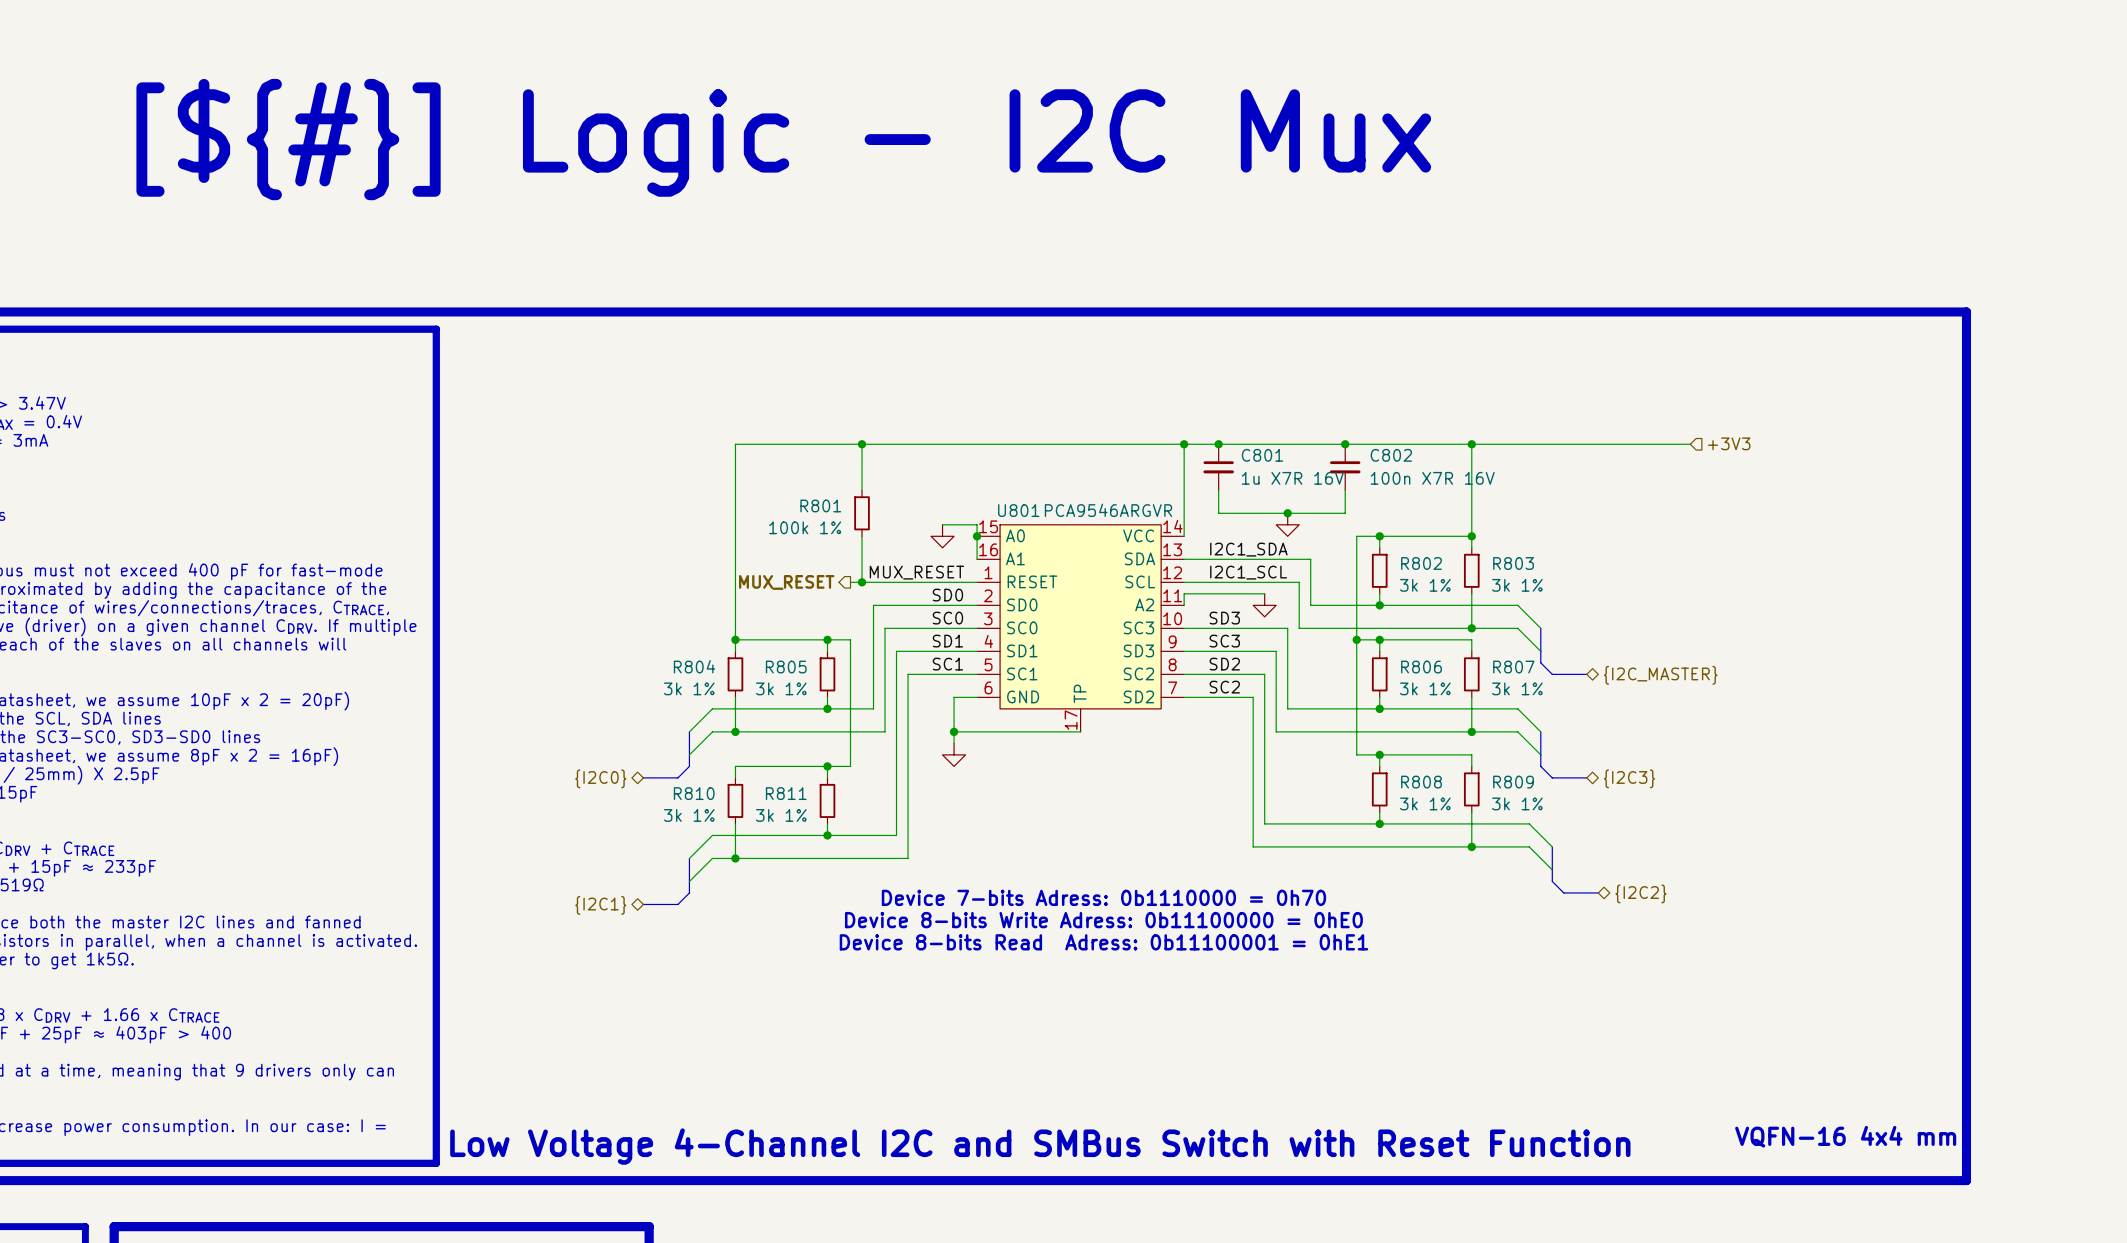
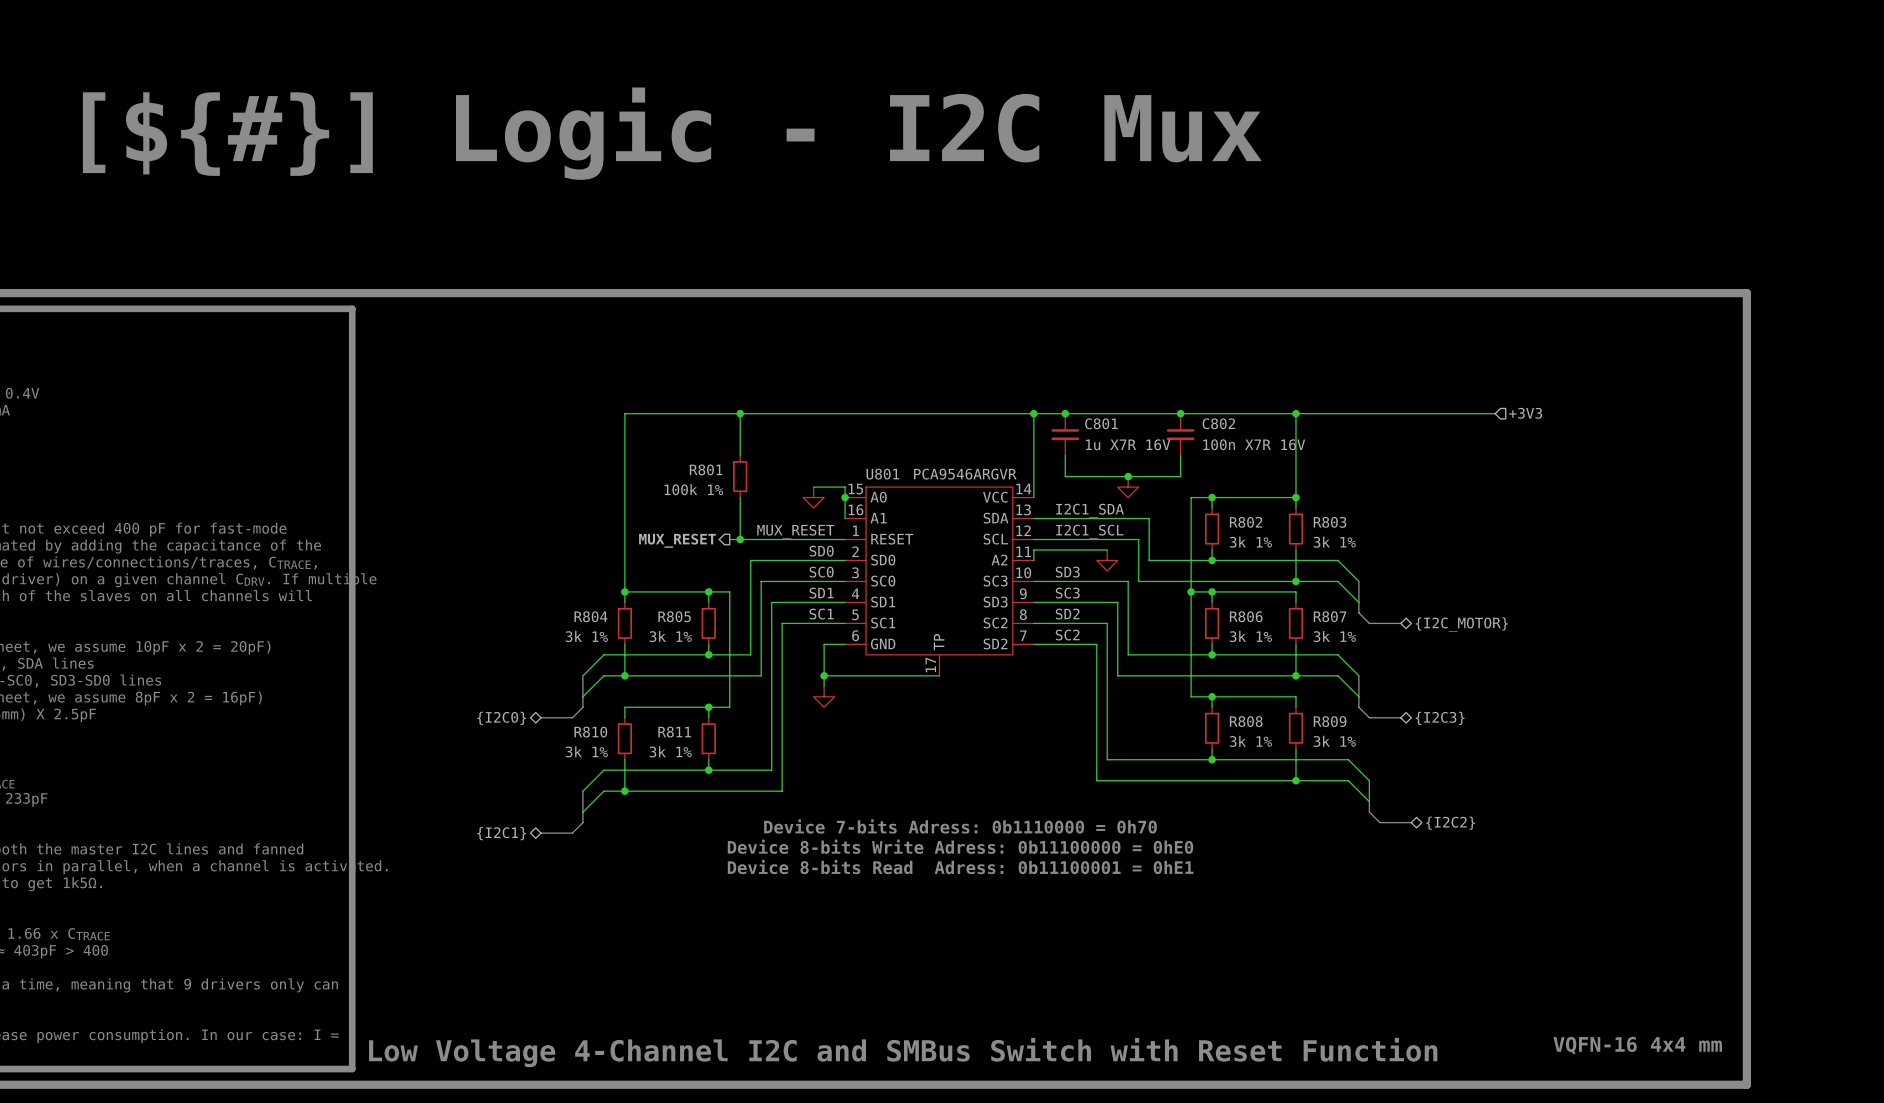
hierarchical label: {I2C_MASTER} (1660, 675) -> {I2C_MOTOR} (1461, 624)

